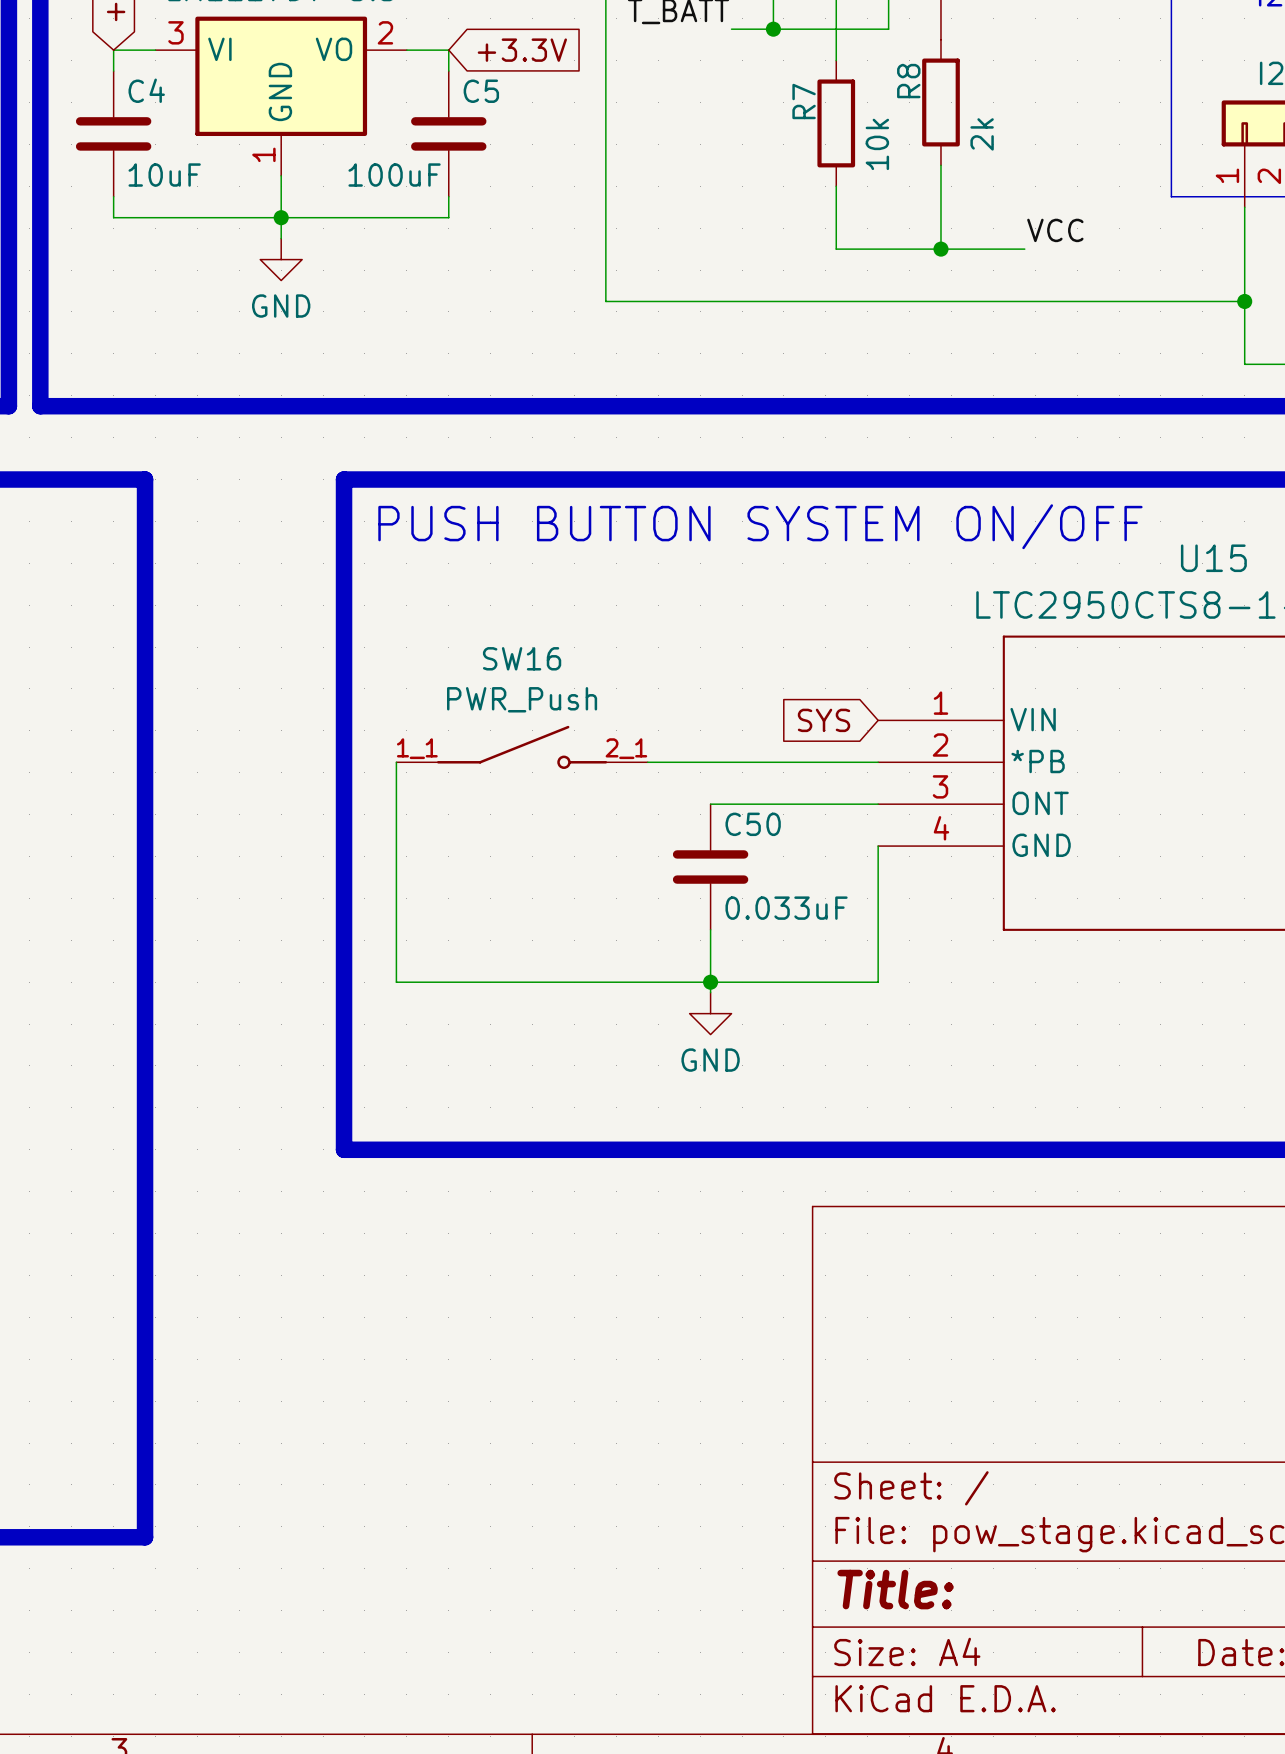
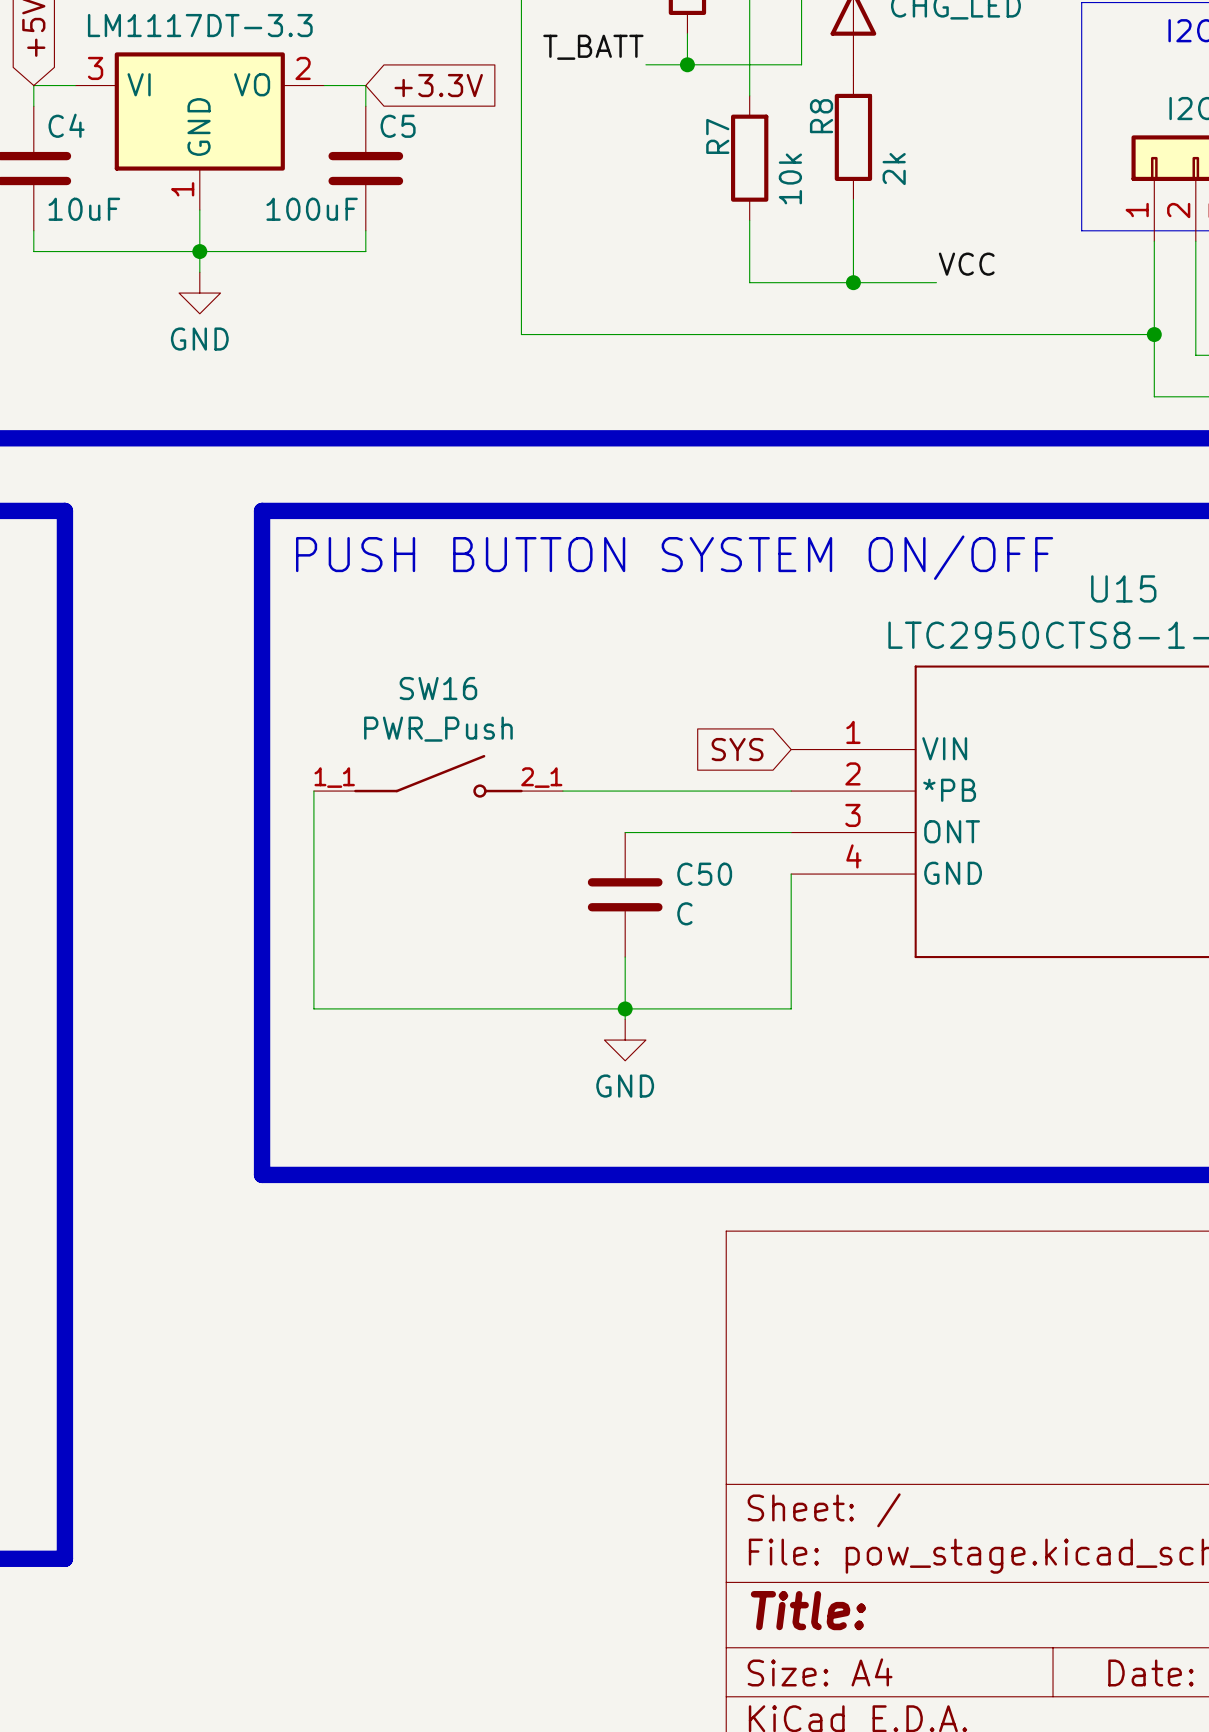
C50 name position: C50 (753, 824) -> C50 (704, 874)
C50 value: 0.033uF (786, 908) -> C (684, 913)

